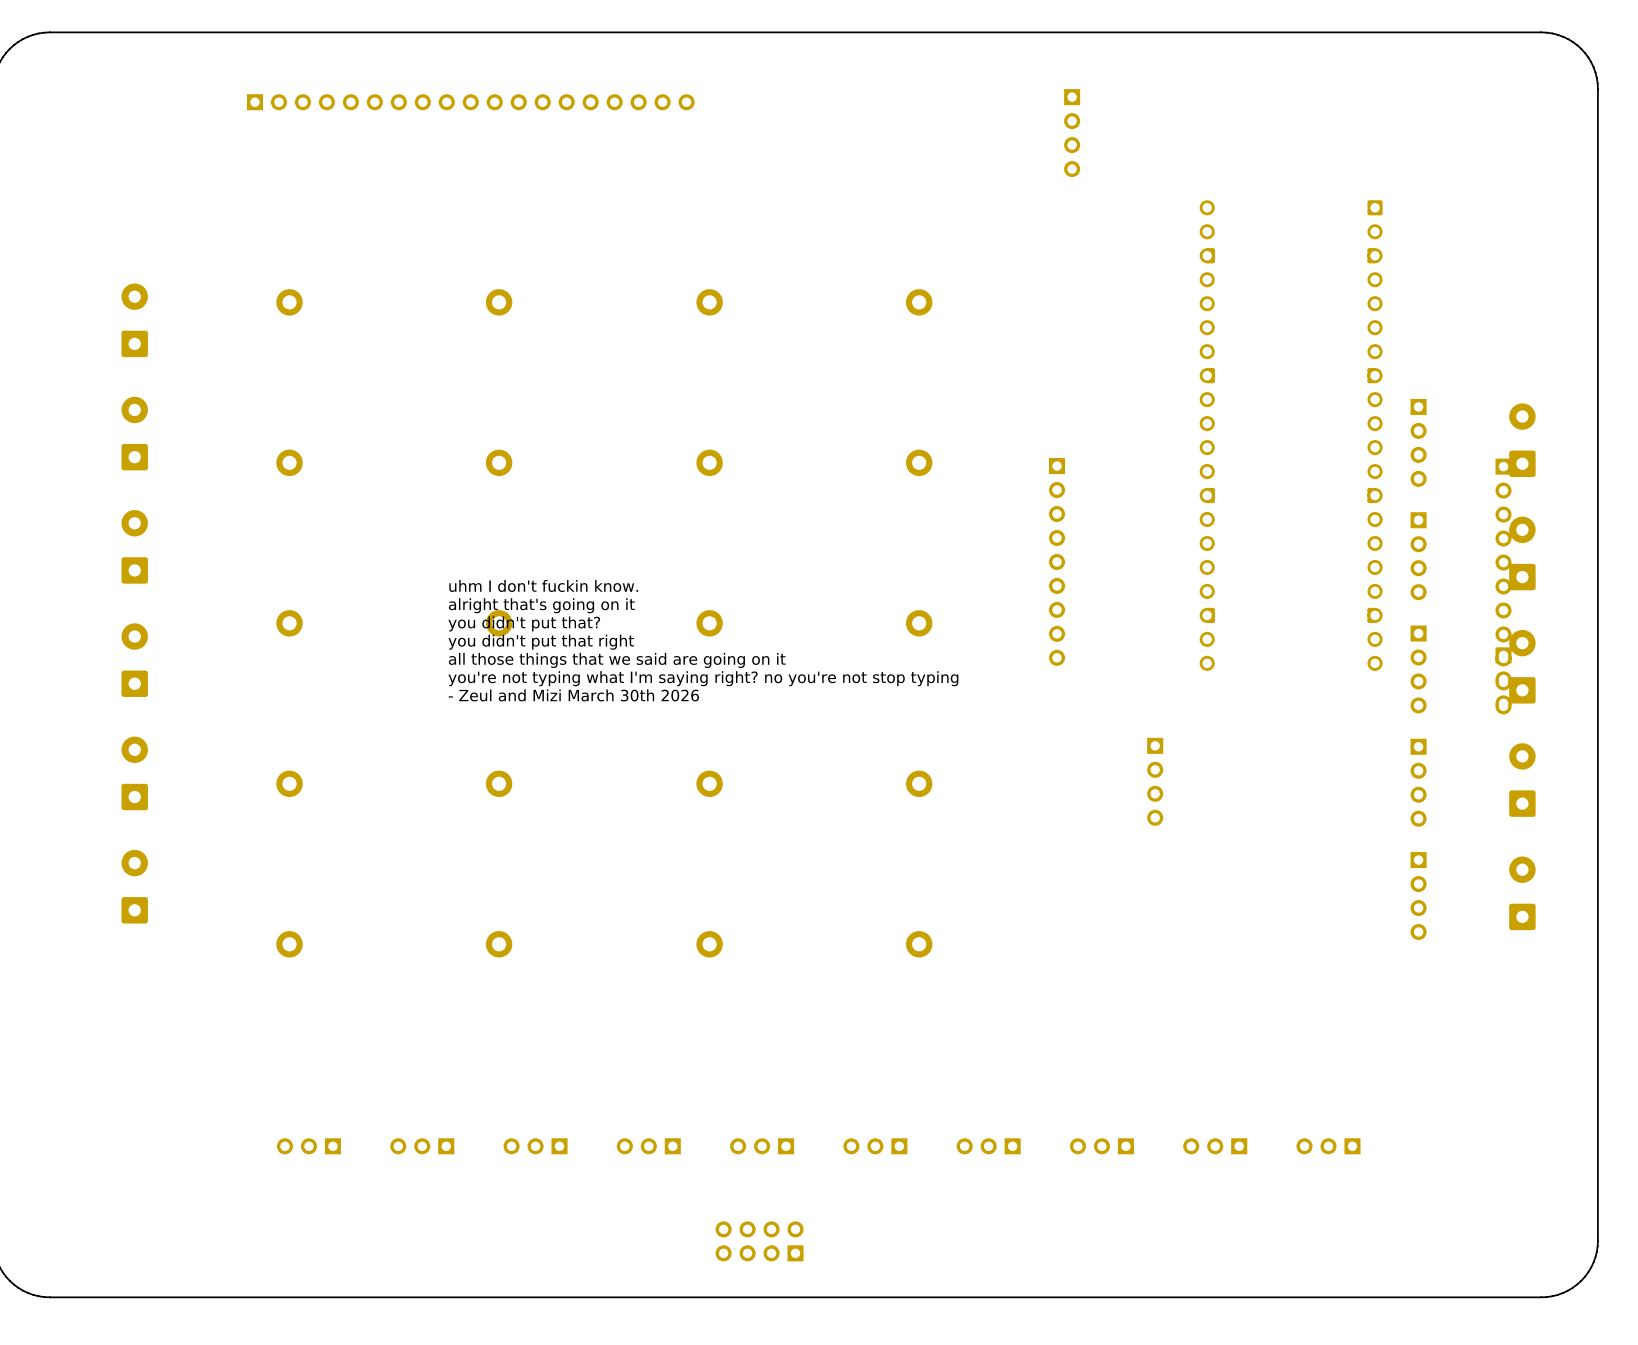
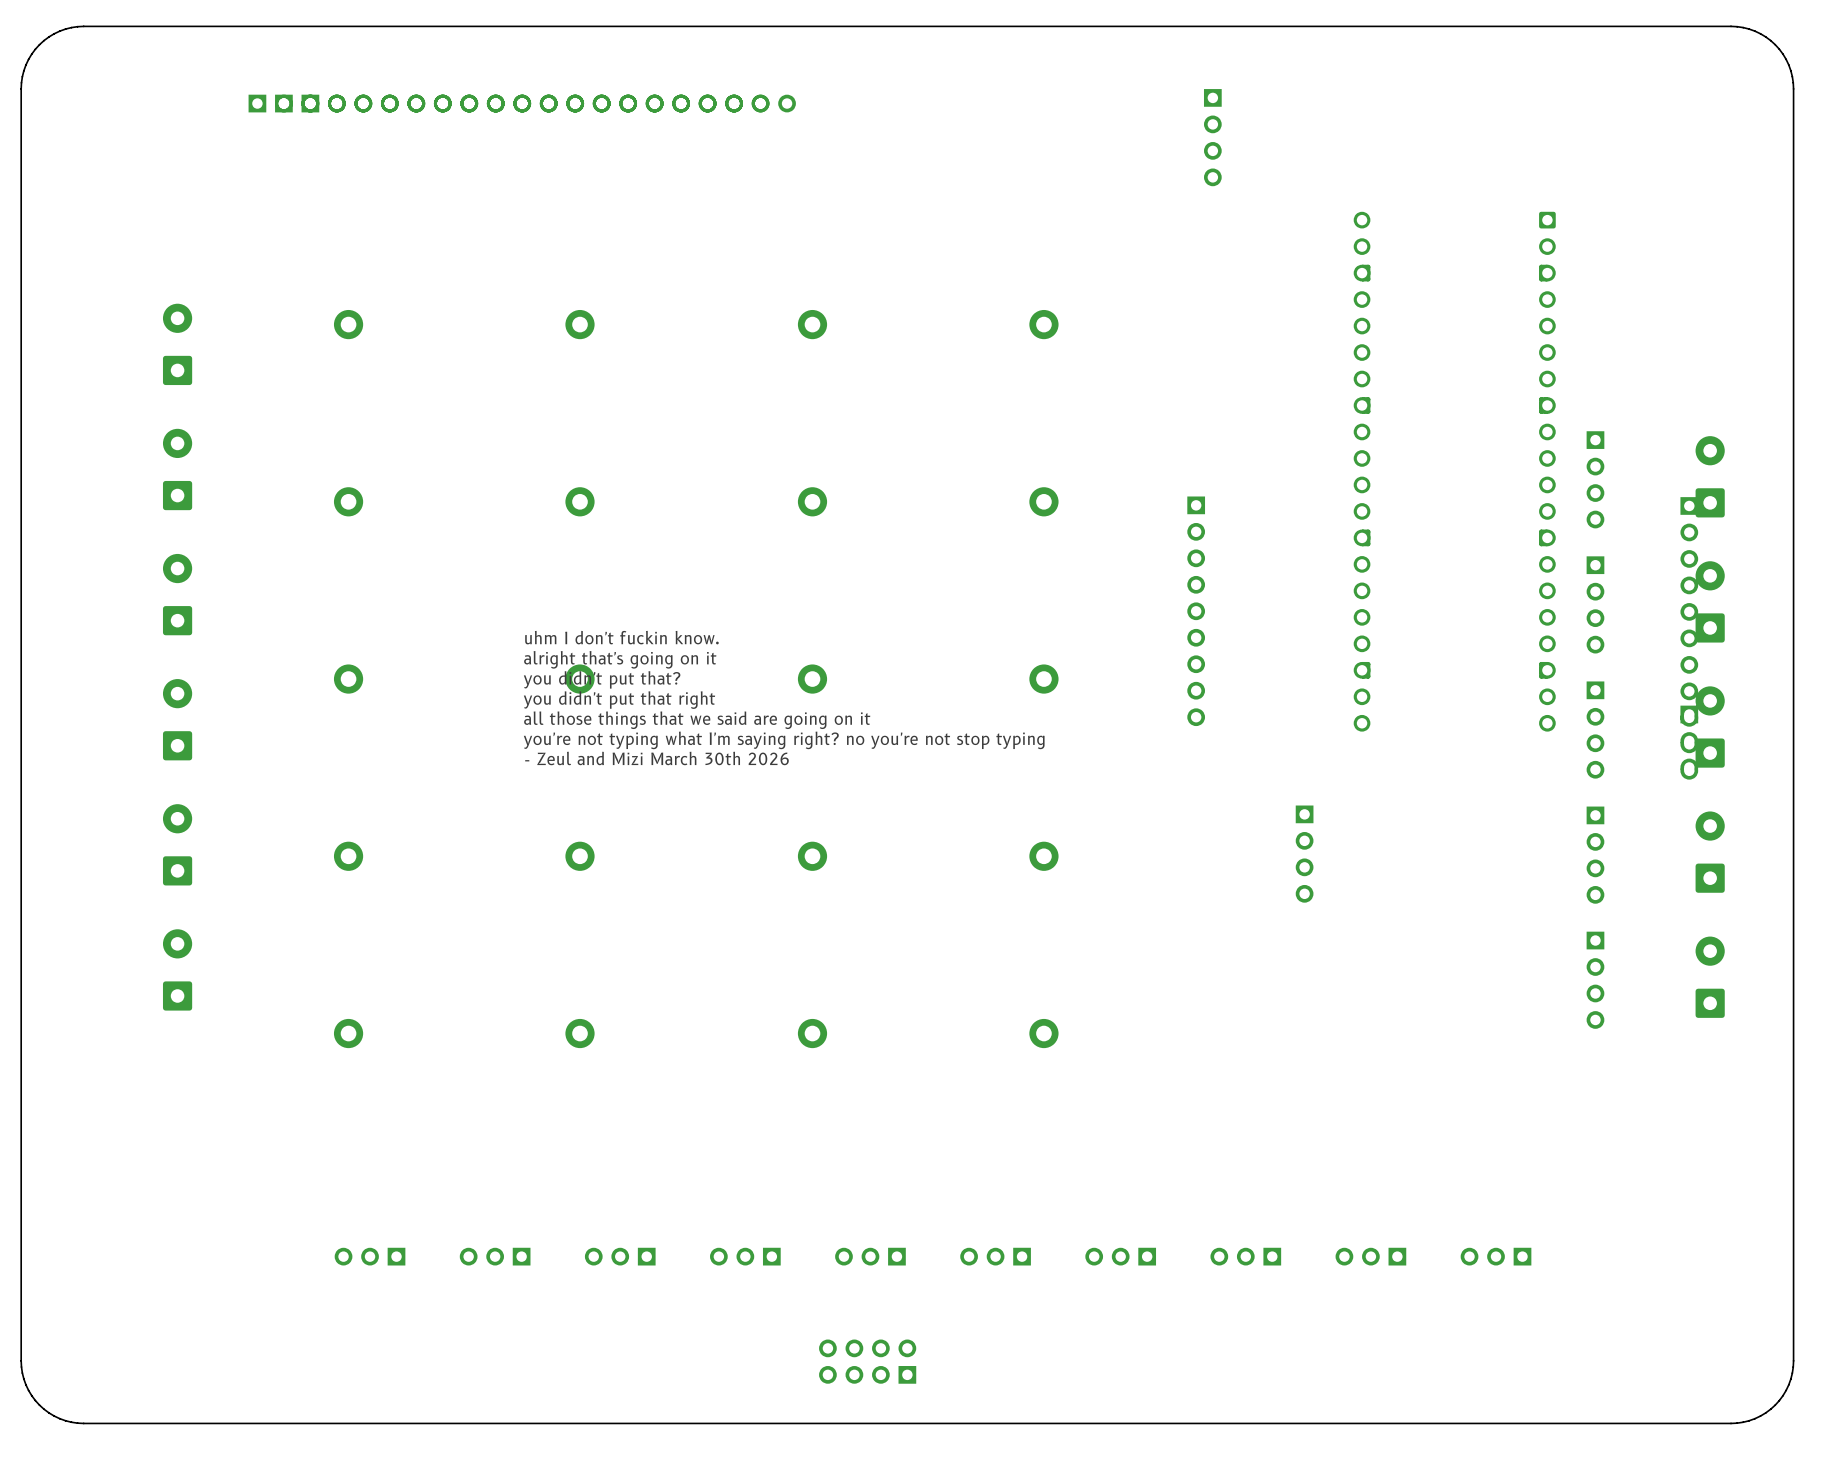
part: none -> (495, 103)
part: none -> (522, 103)

